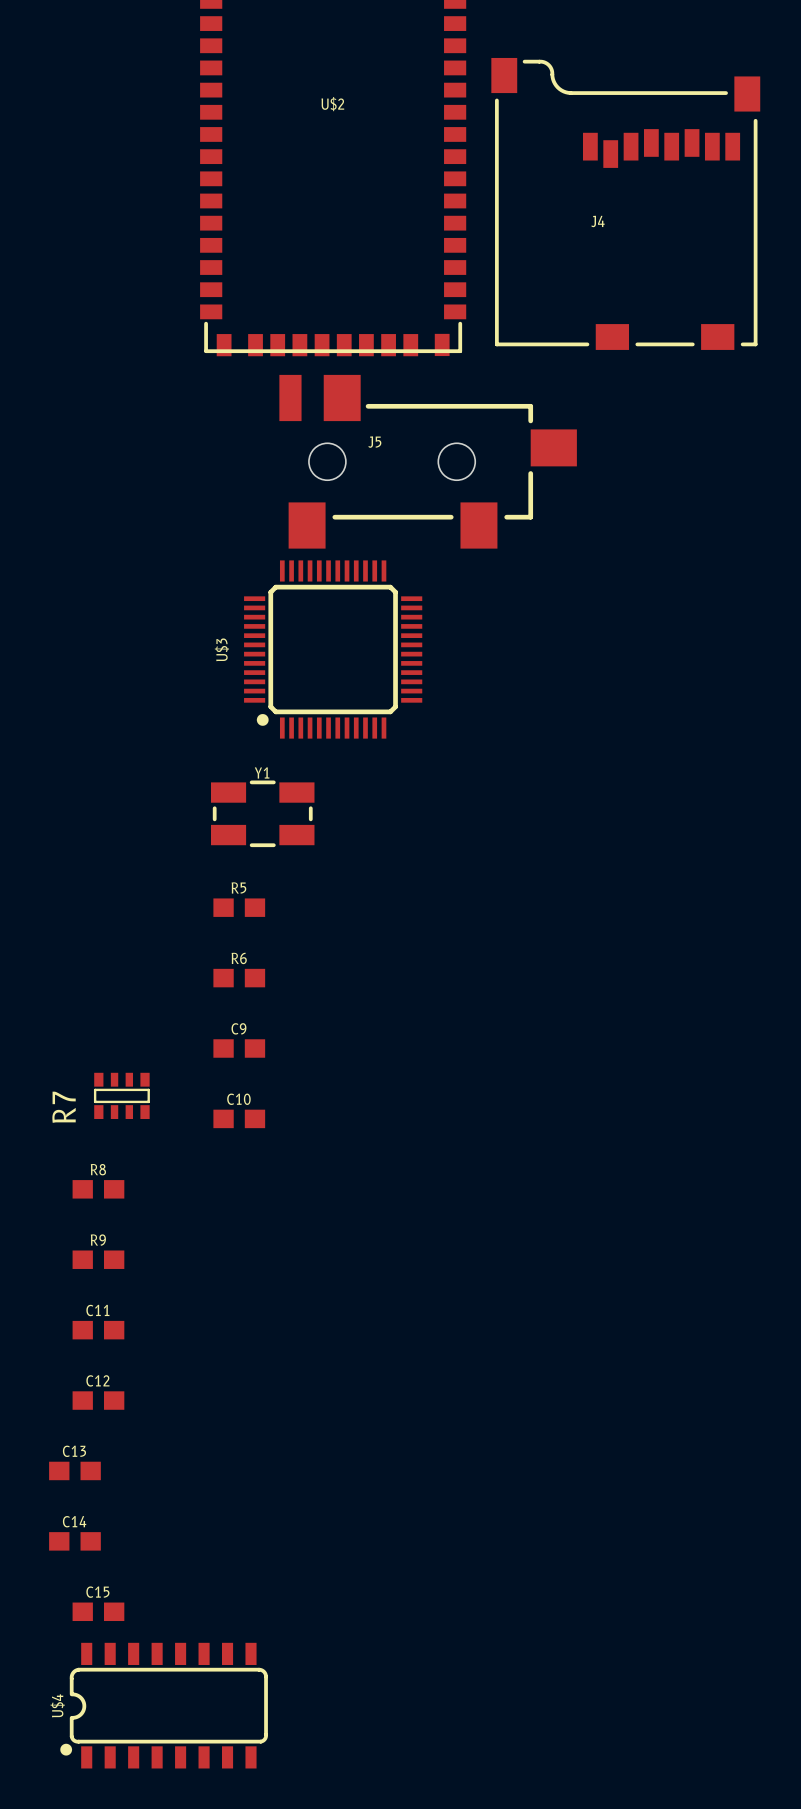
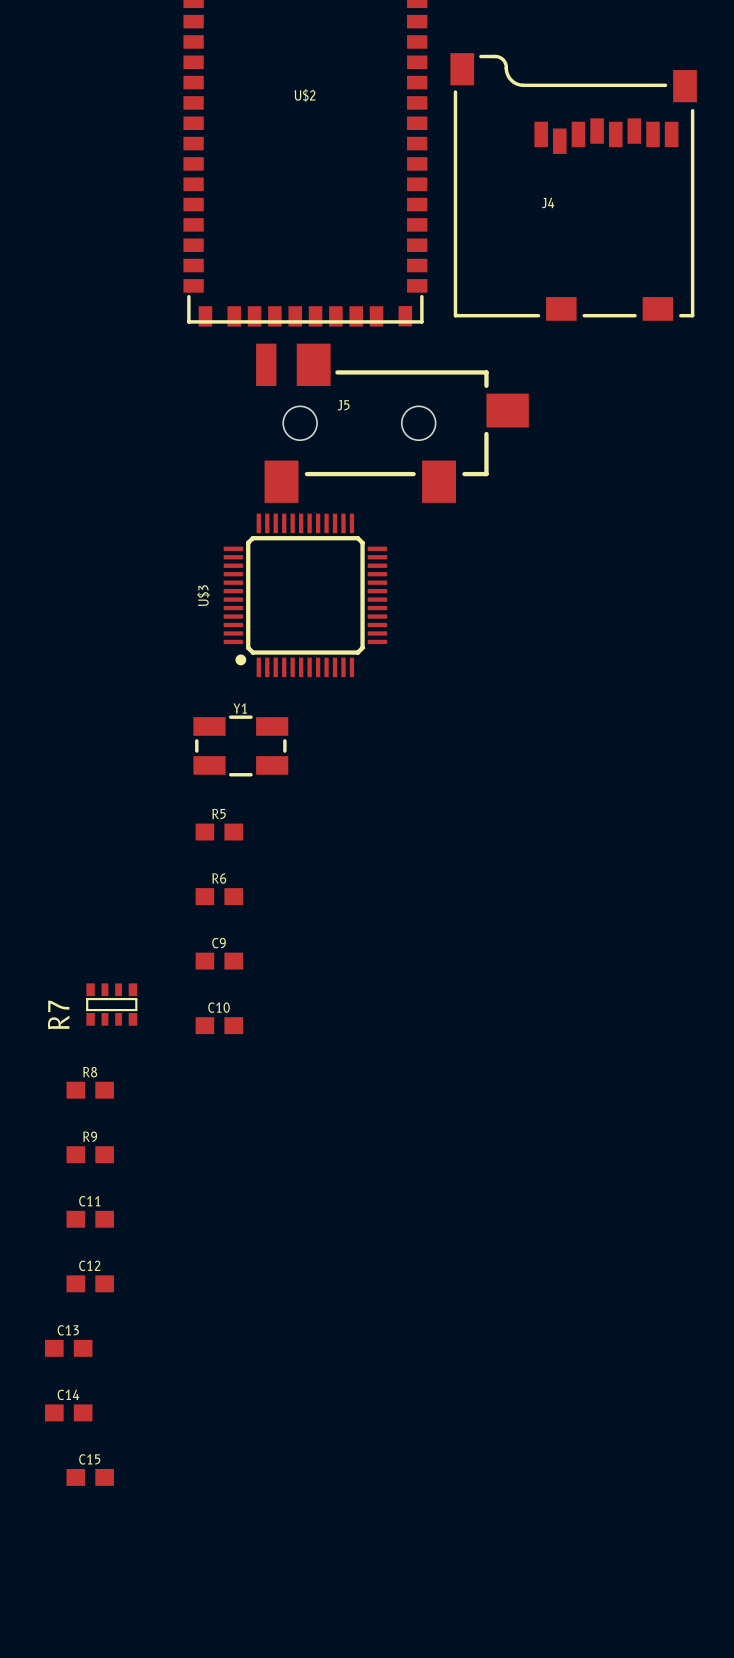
U$4: (164, 1705) -> none

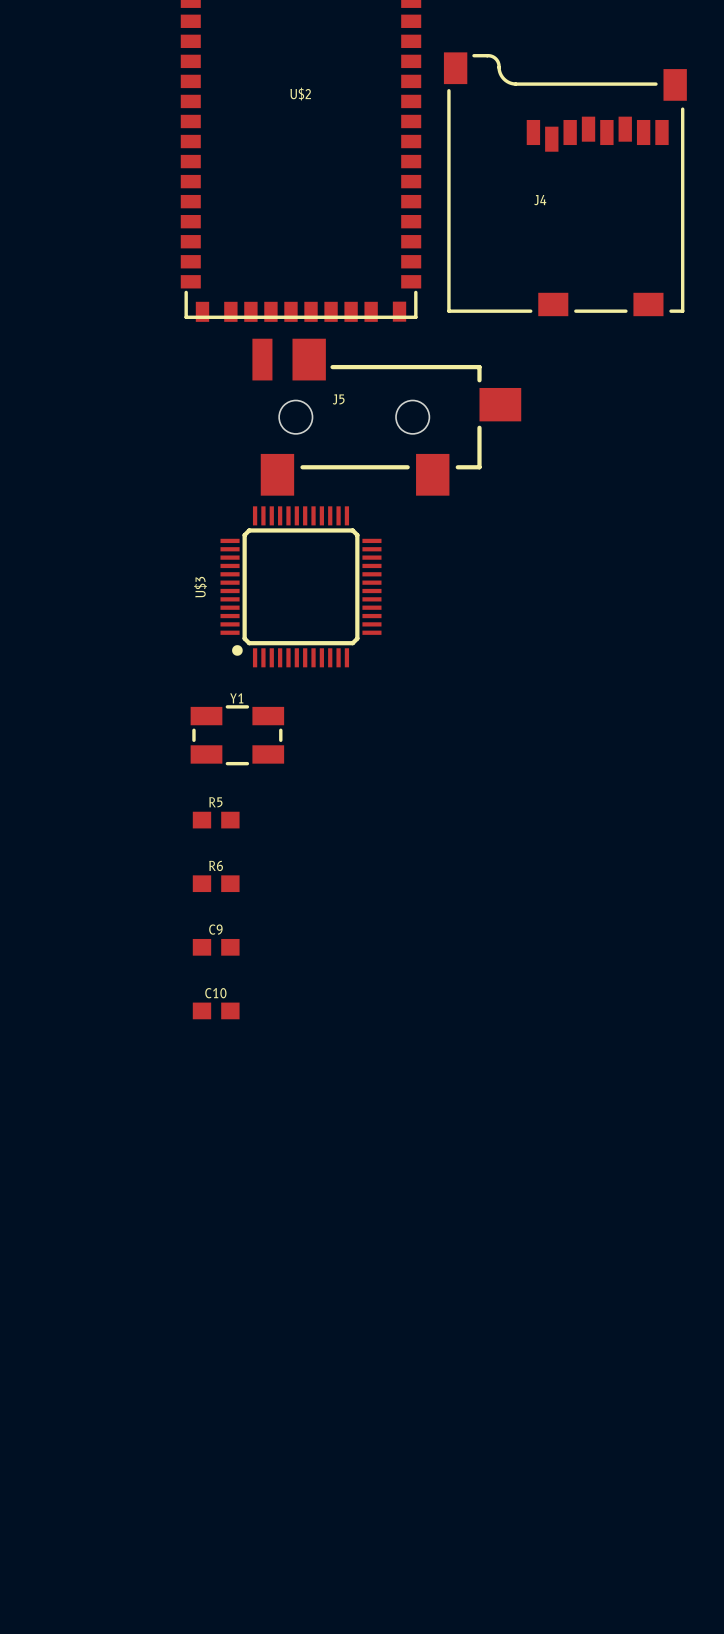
R7: (111, 1004) -> none
R8: (90, 1090) -> none
R9: (90, 1154) -> none
C11: (90, 1219) -> none
C12: (90, 1283) -> none
C13: (68, 1348) -> none
C14: (68, 1412) -> none
C15: (90, 1477) -> none

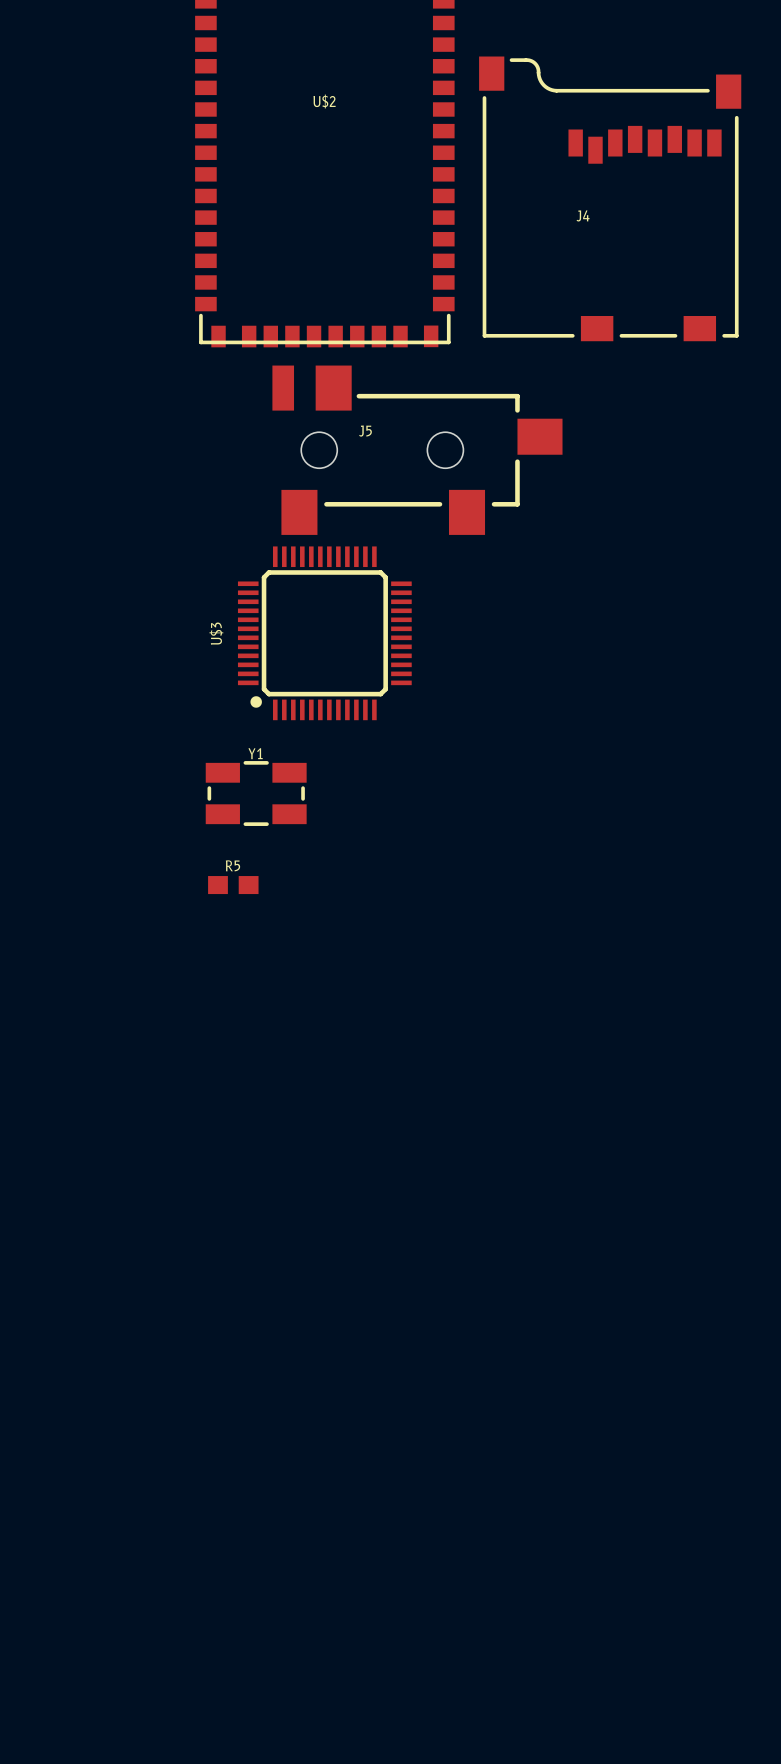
R6: (216, 883) -> none
C9: (216, 947) -> none
C10: (216, 1010) -> none

